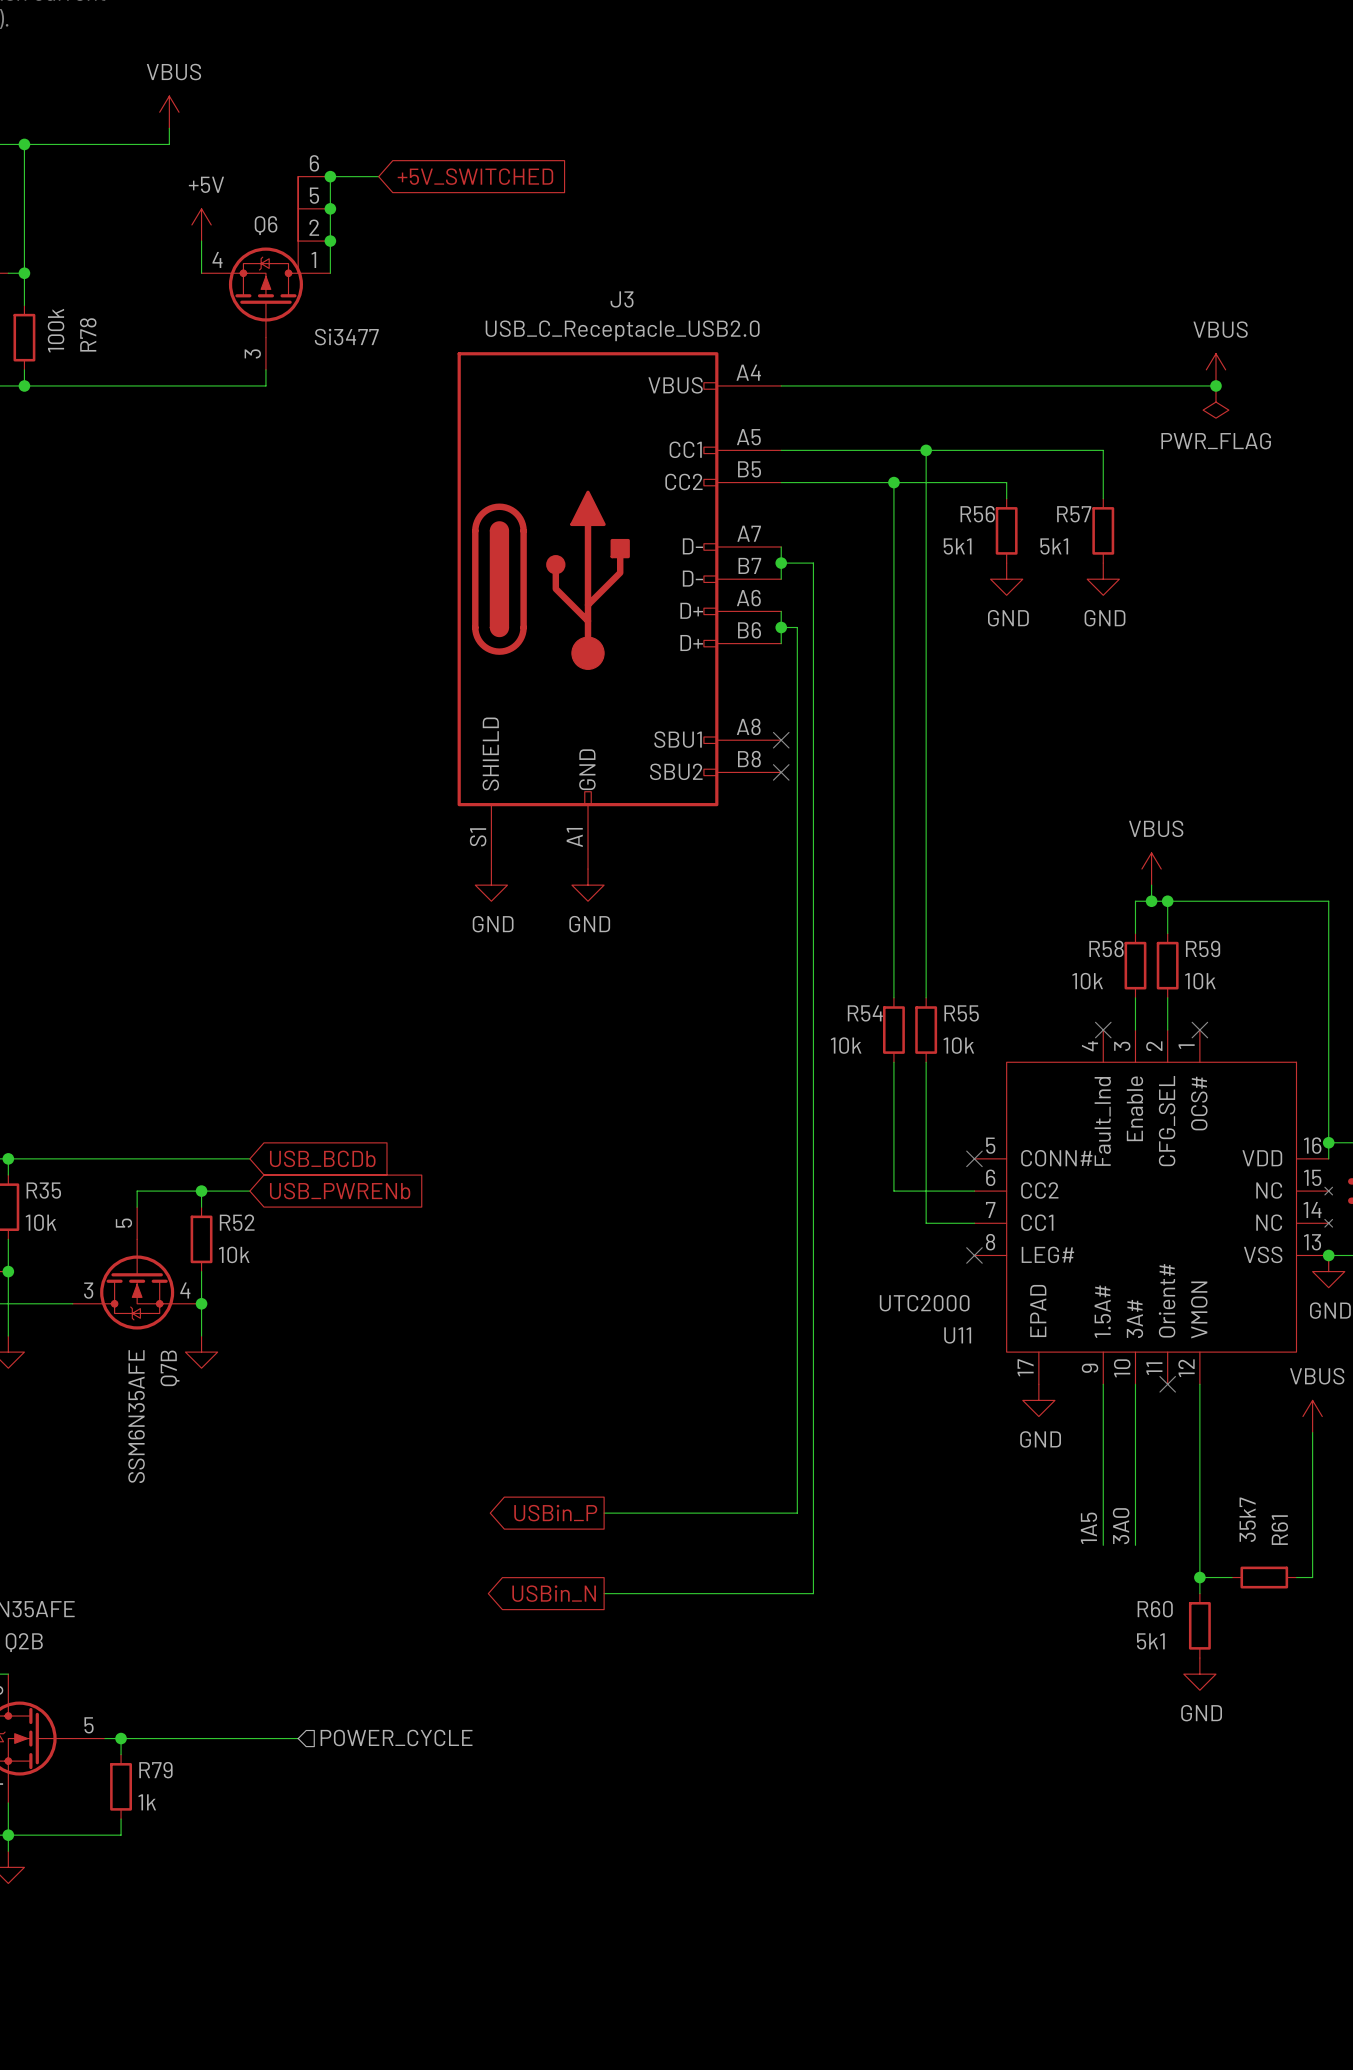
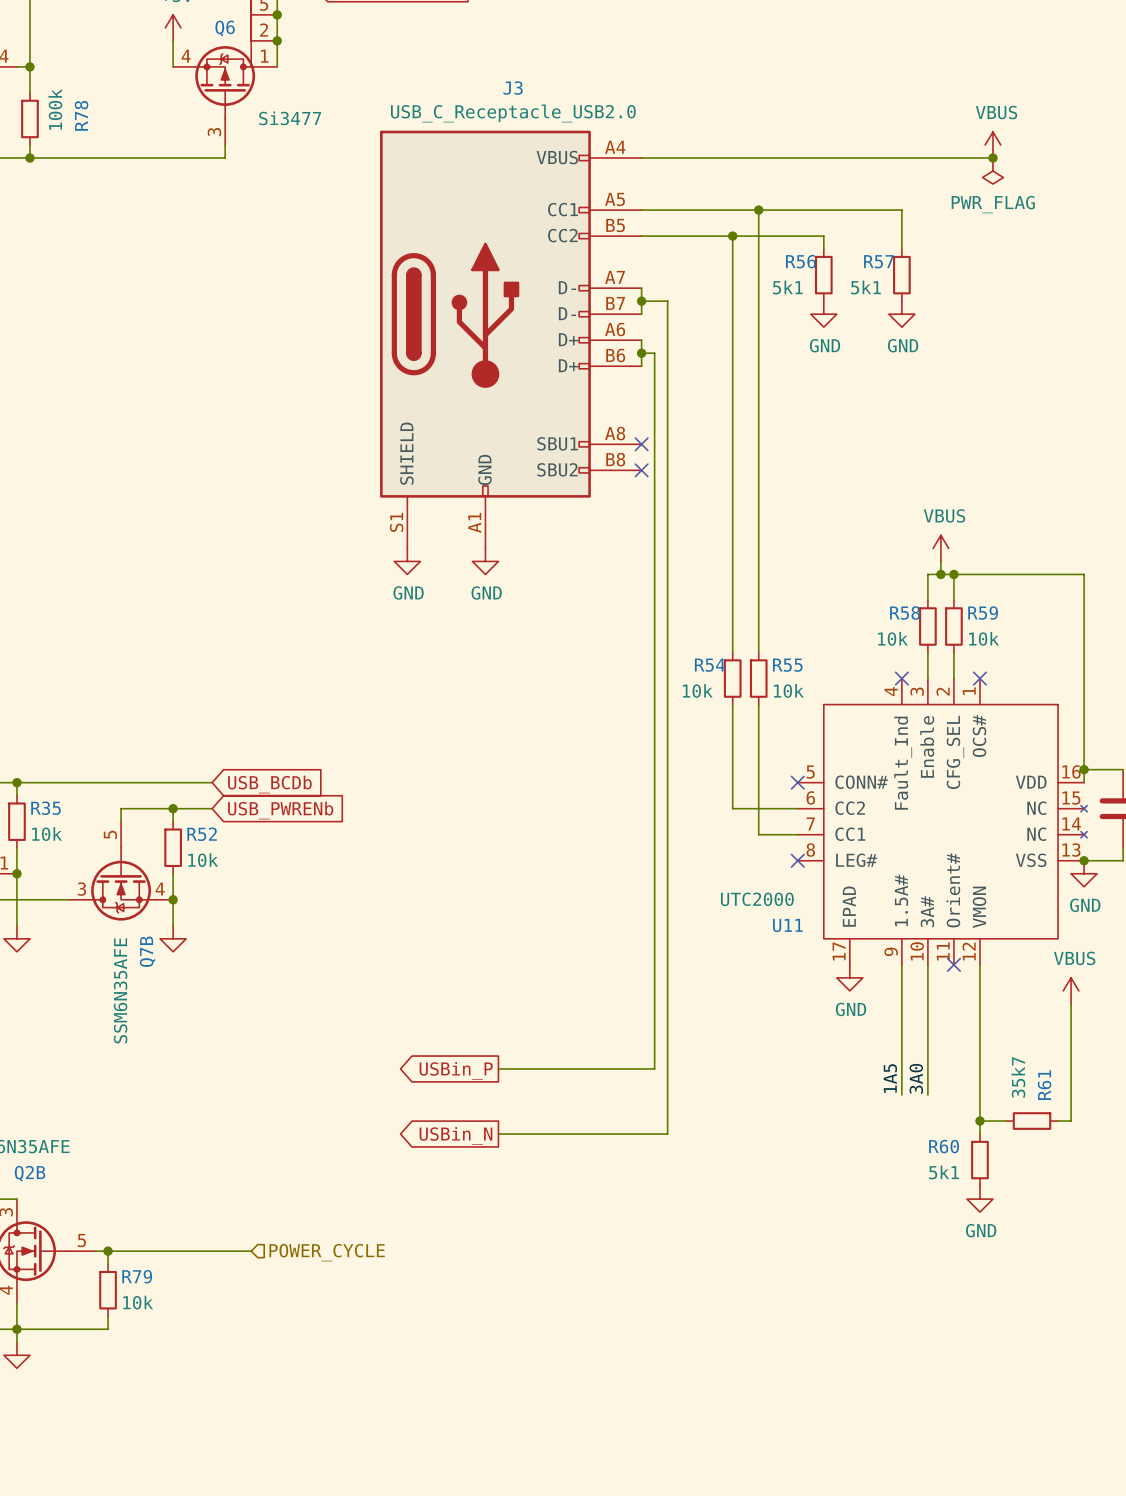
R79 value: 1k (147, 1802) -> 10k (138, 1302)

